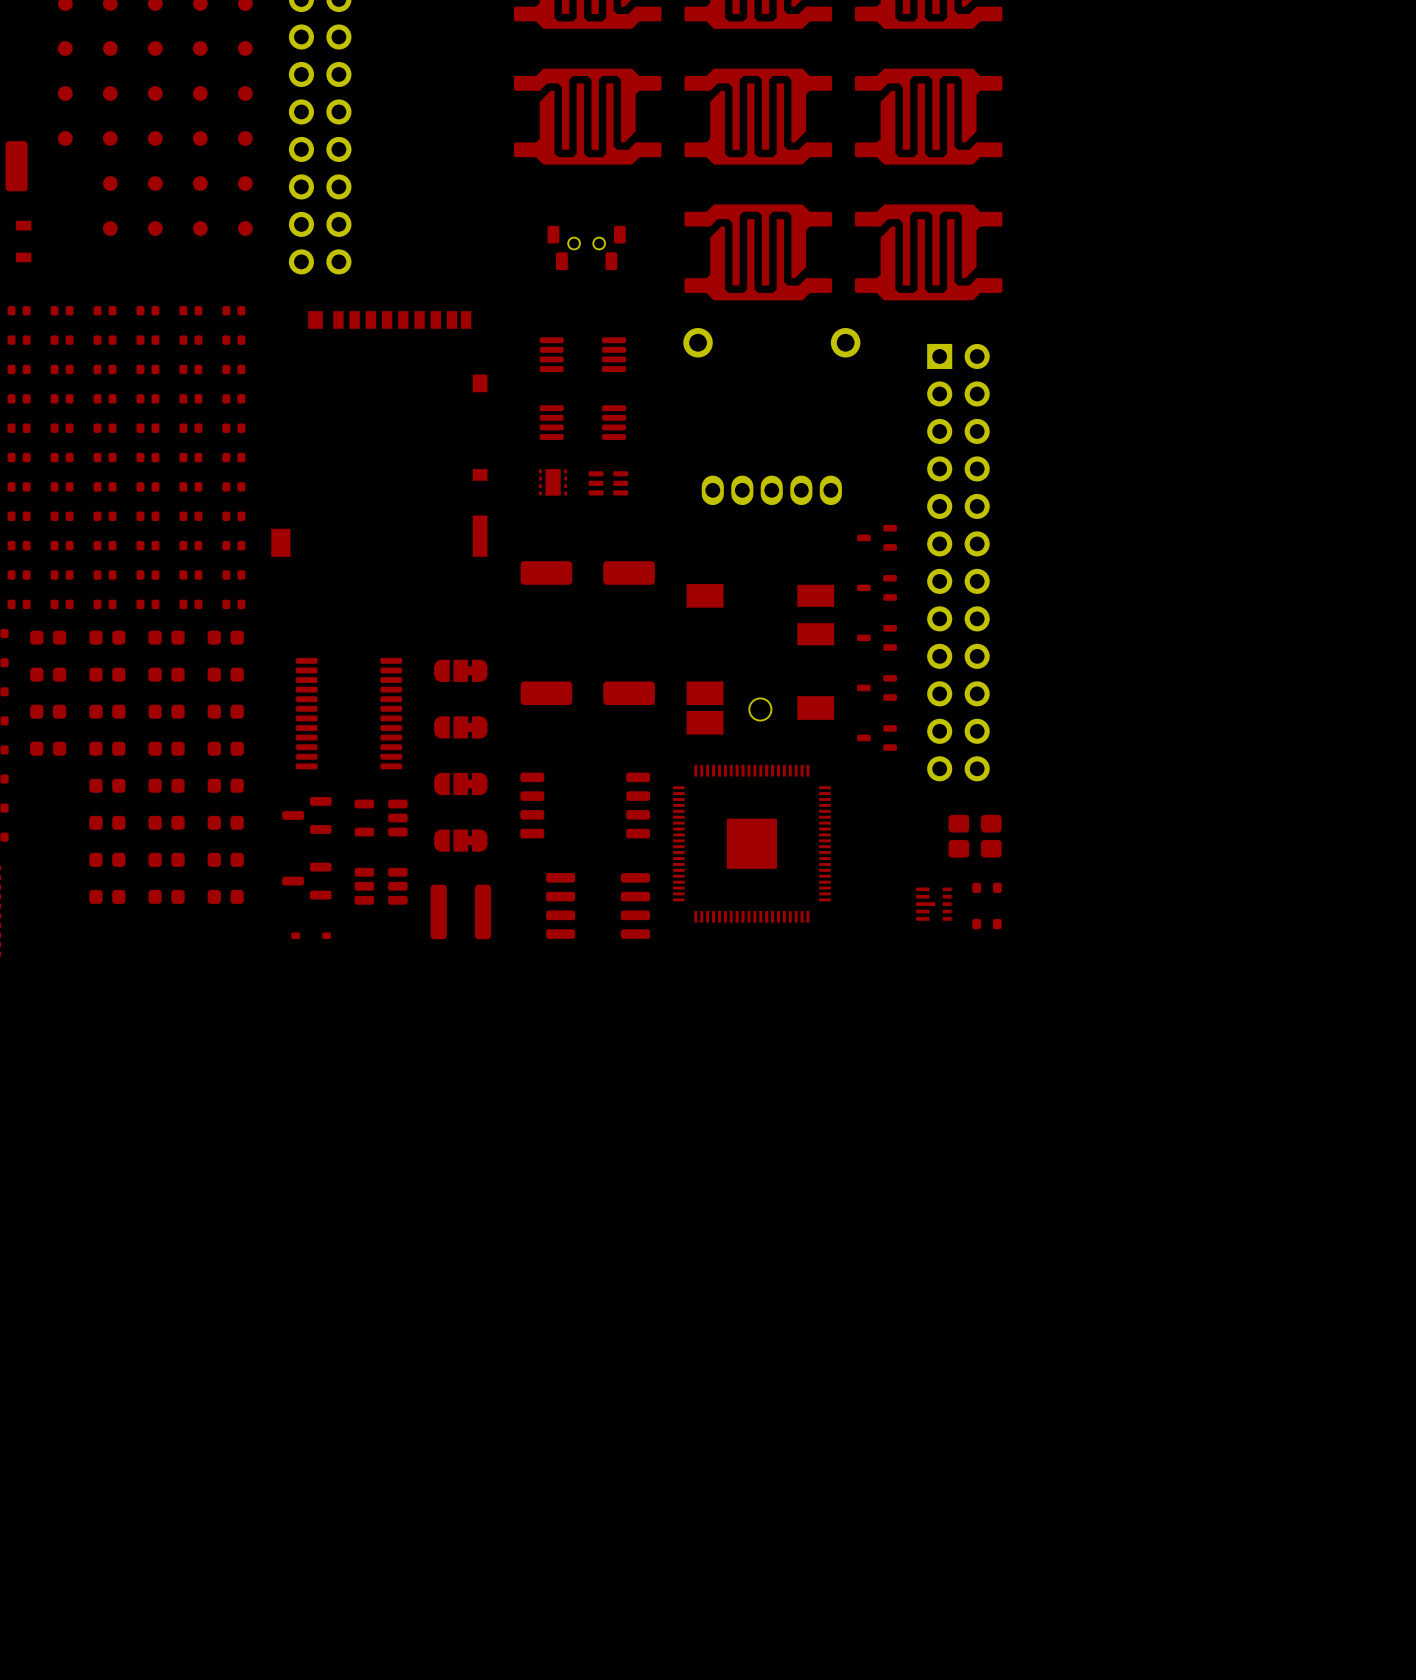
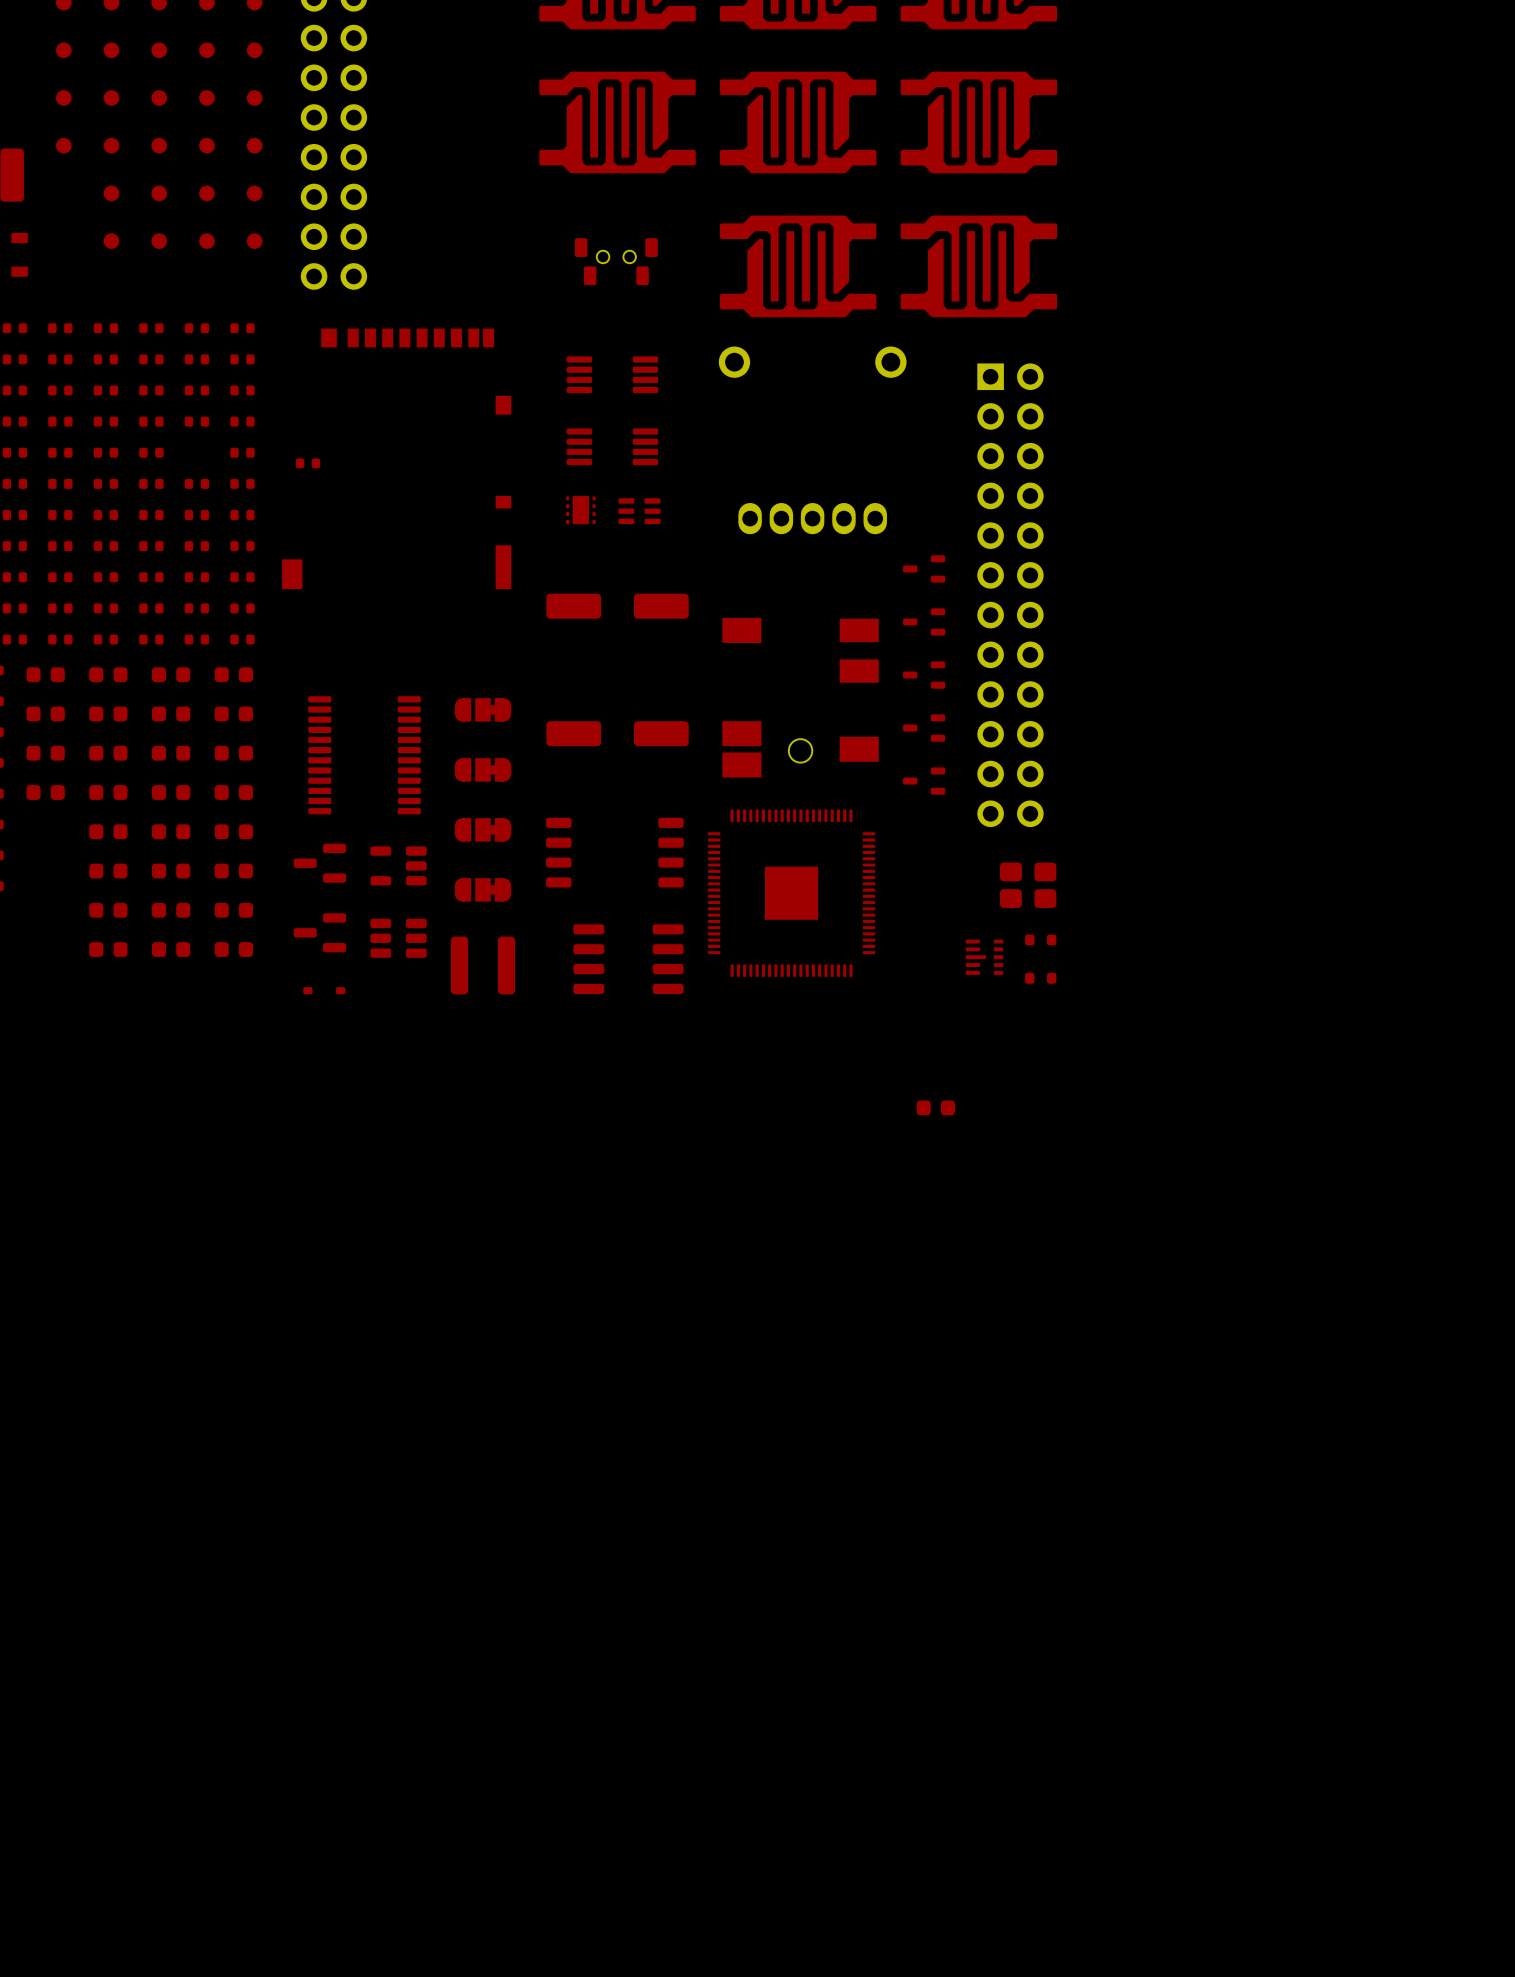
part position: (190, 428) -> (308, 463)
part: none -> (935, 1107)

